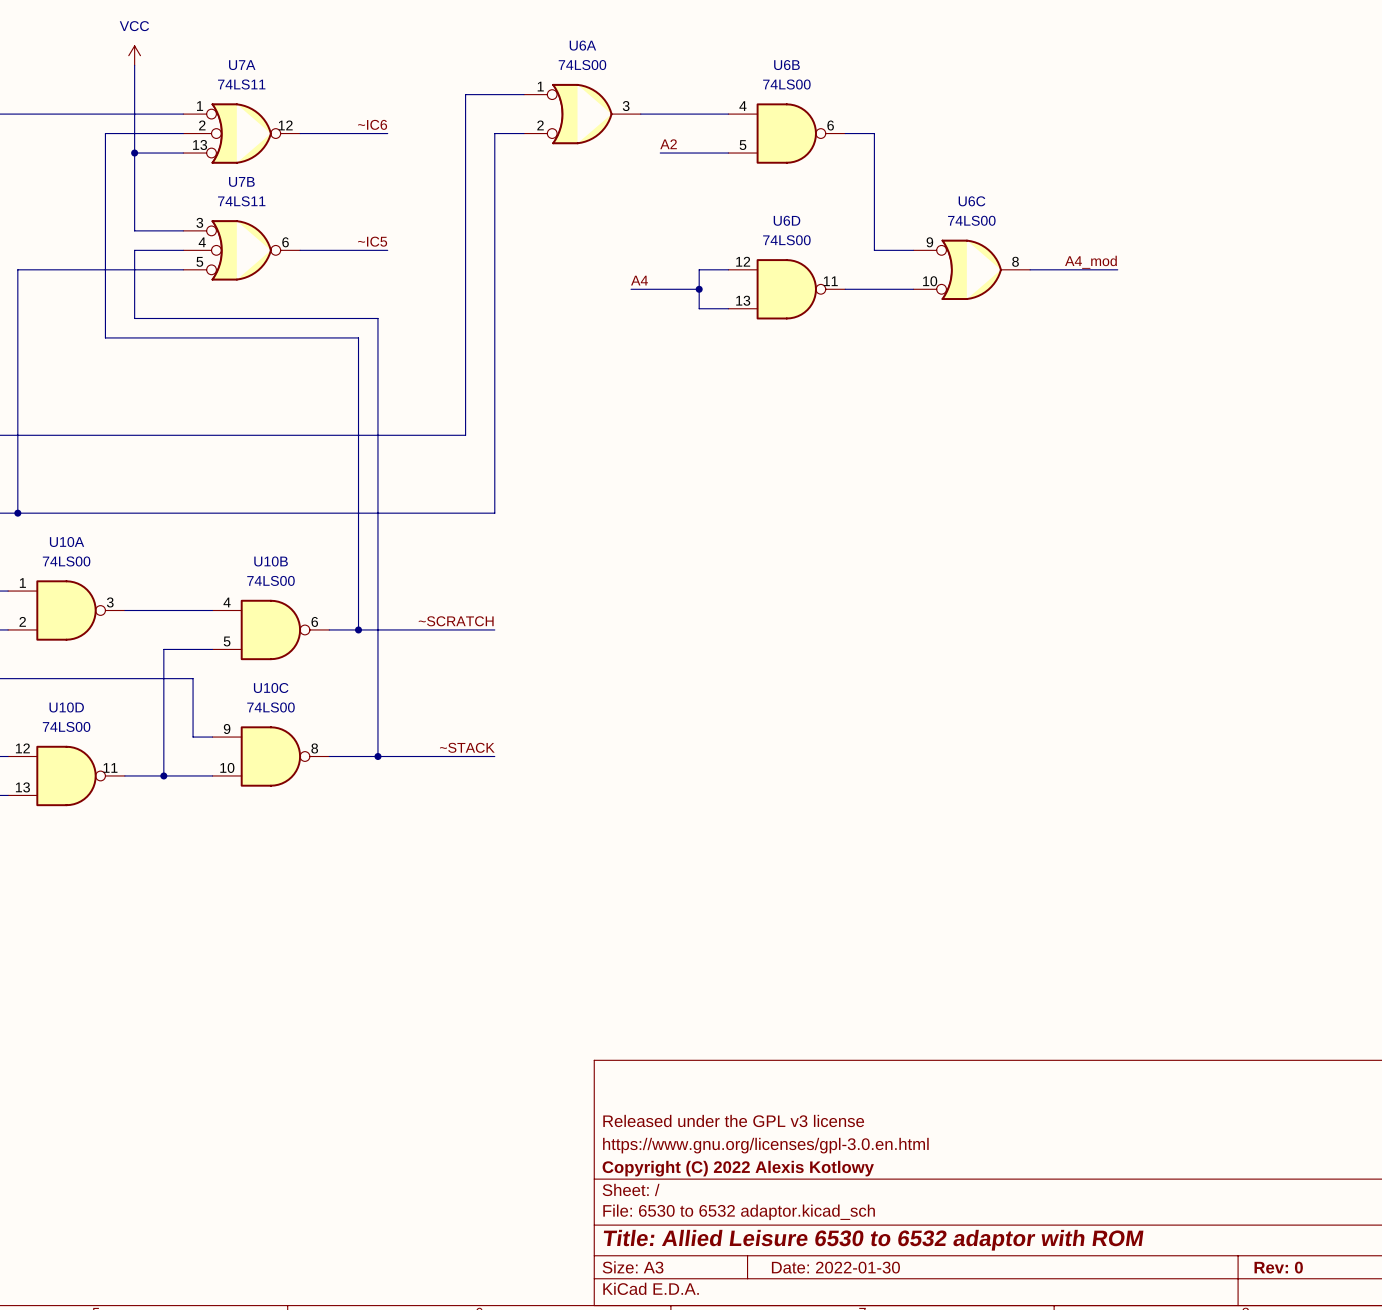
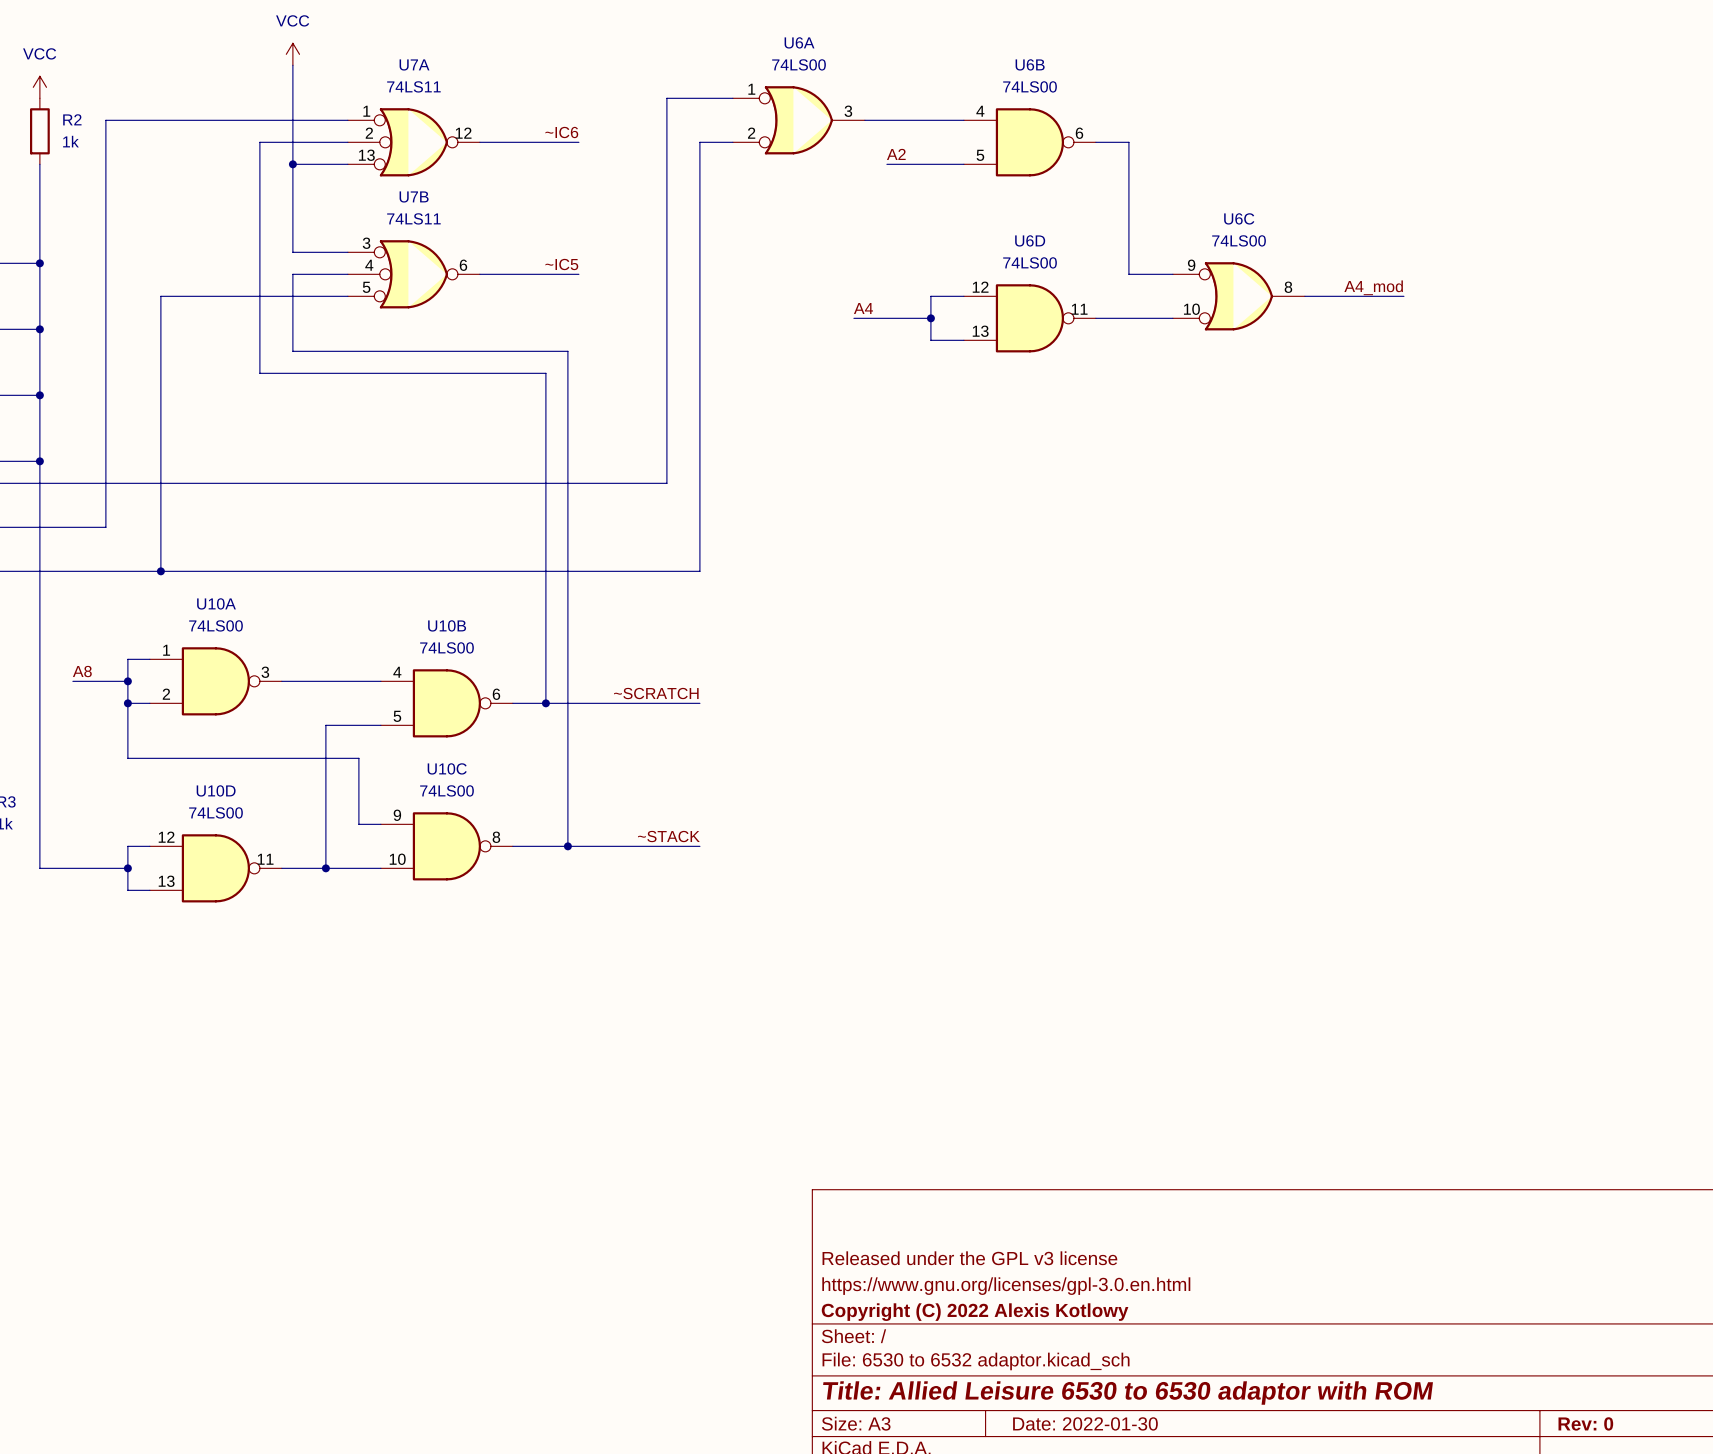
title block: Title: Allied Leisure 6530 to 6532 adaptor with ROM (873, 1240) -> Title: Allied Leisure 6530 to 6530 adaptor with ROM (1128, 1393)

